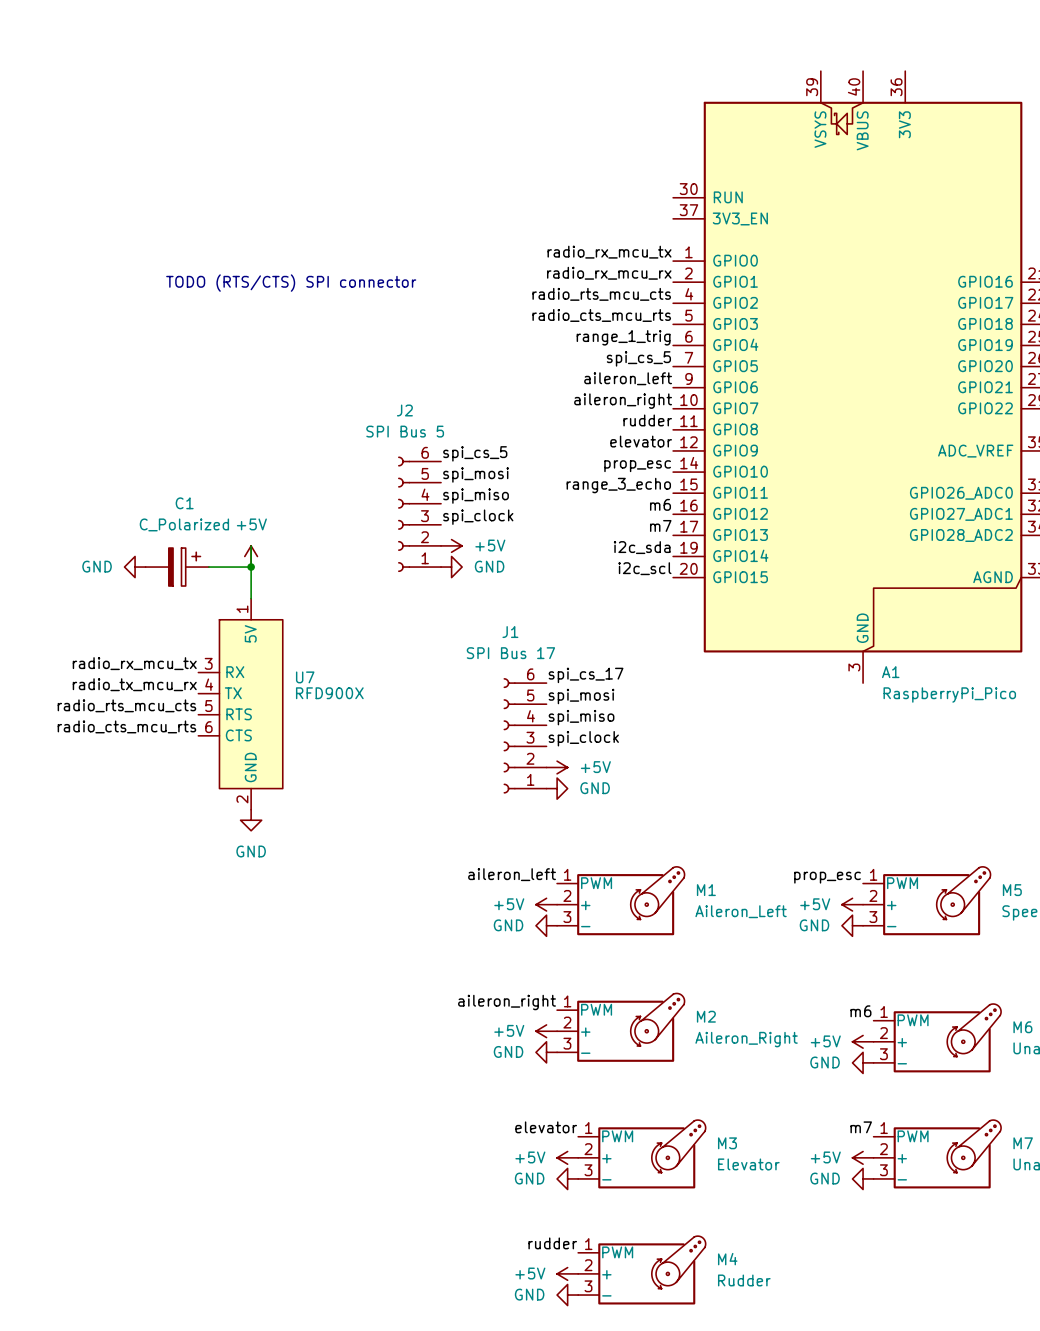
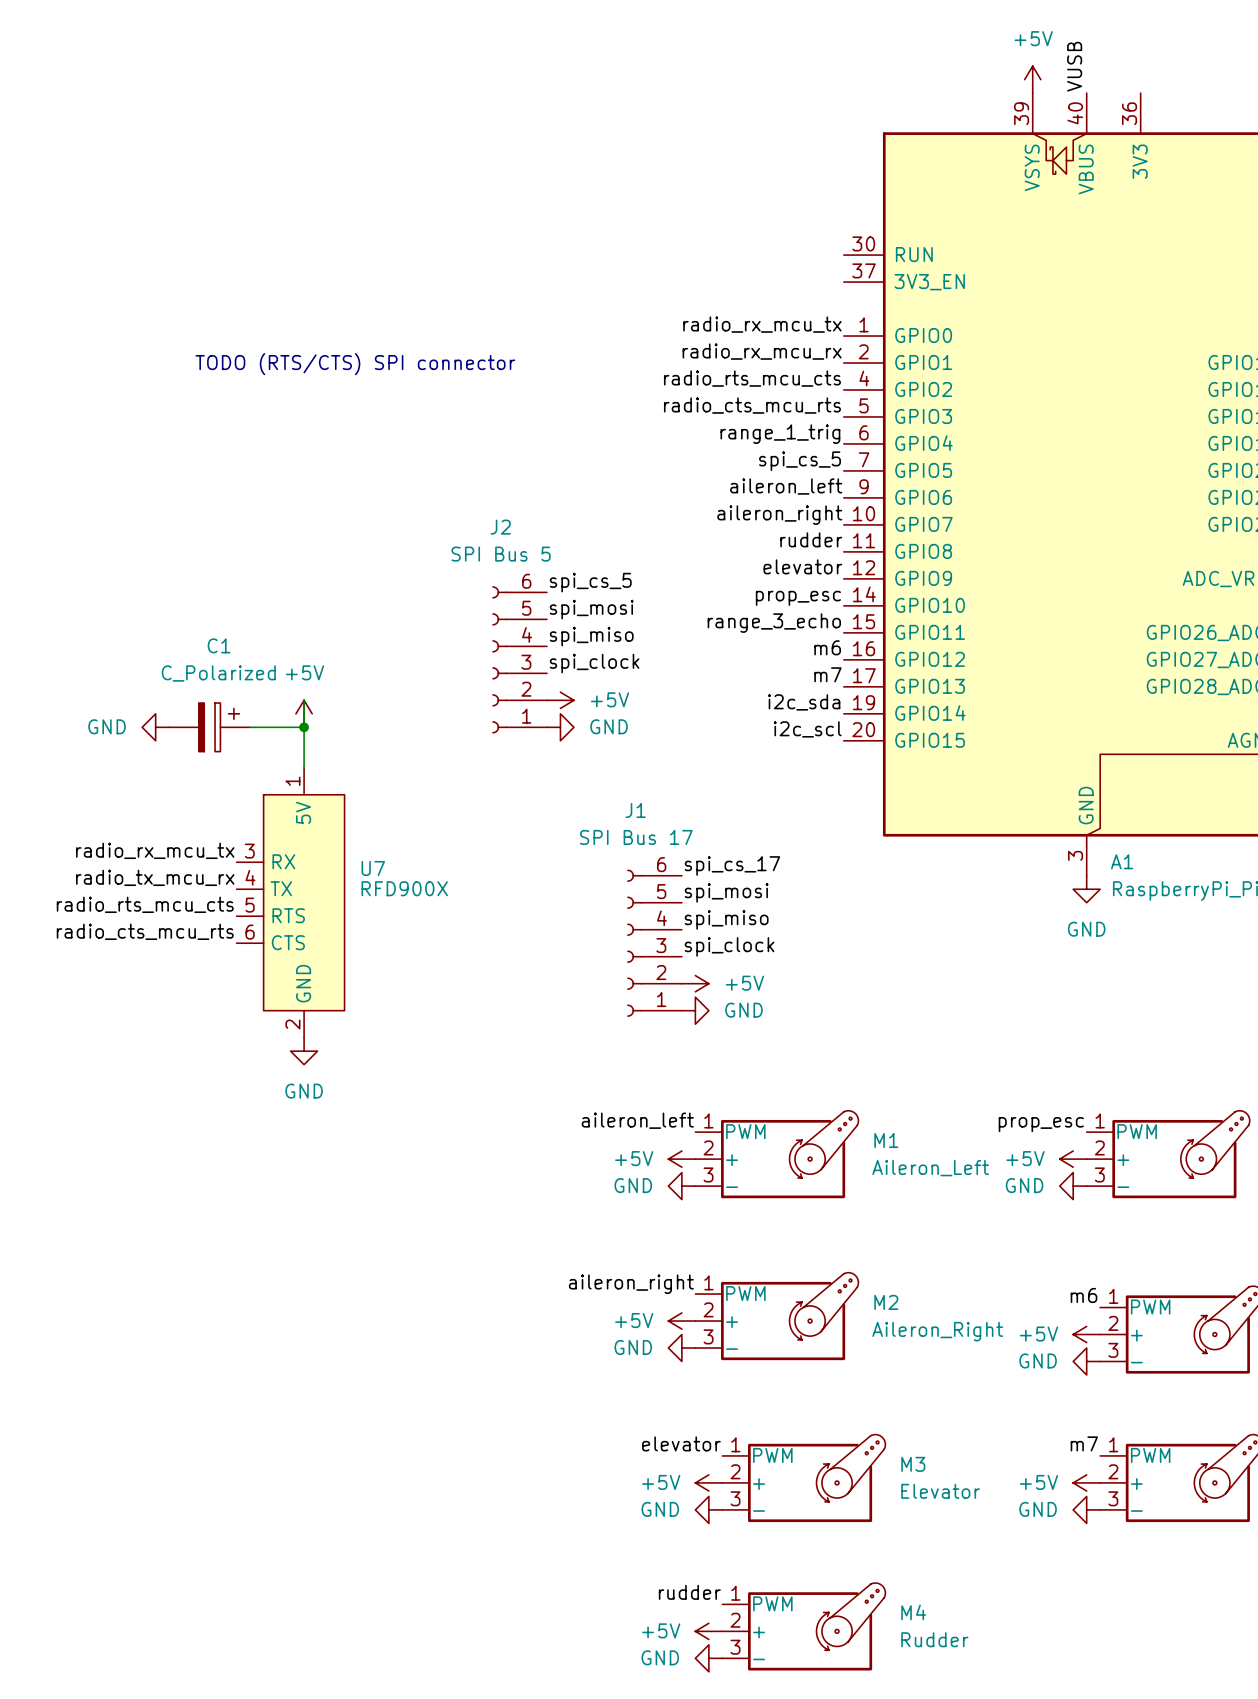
label: none -> VUSB (1074, 66)
power symbol: none -> +5V (1032, 79)
power symbol: none -> GND (1086, 889)

